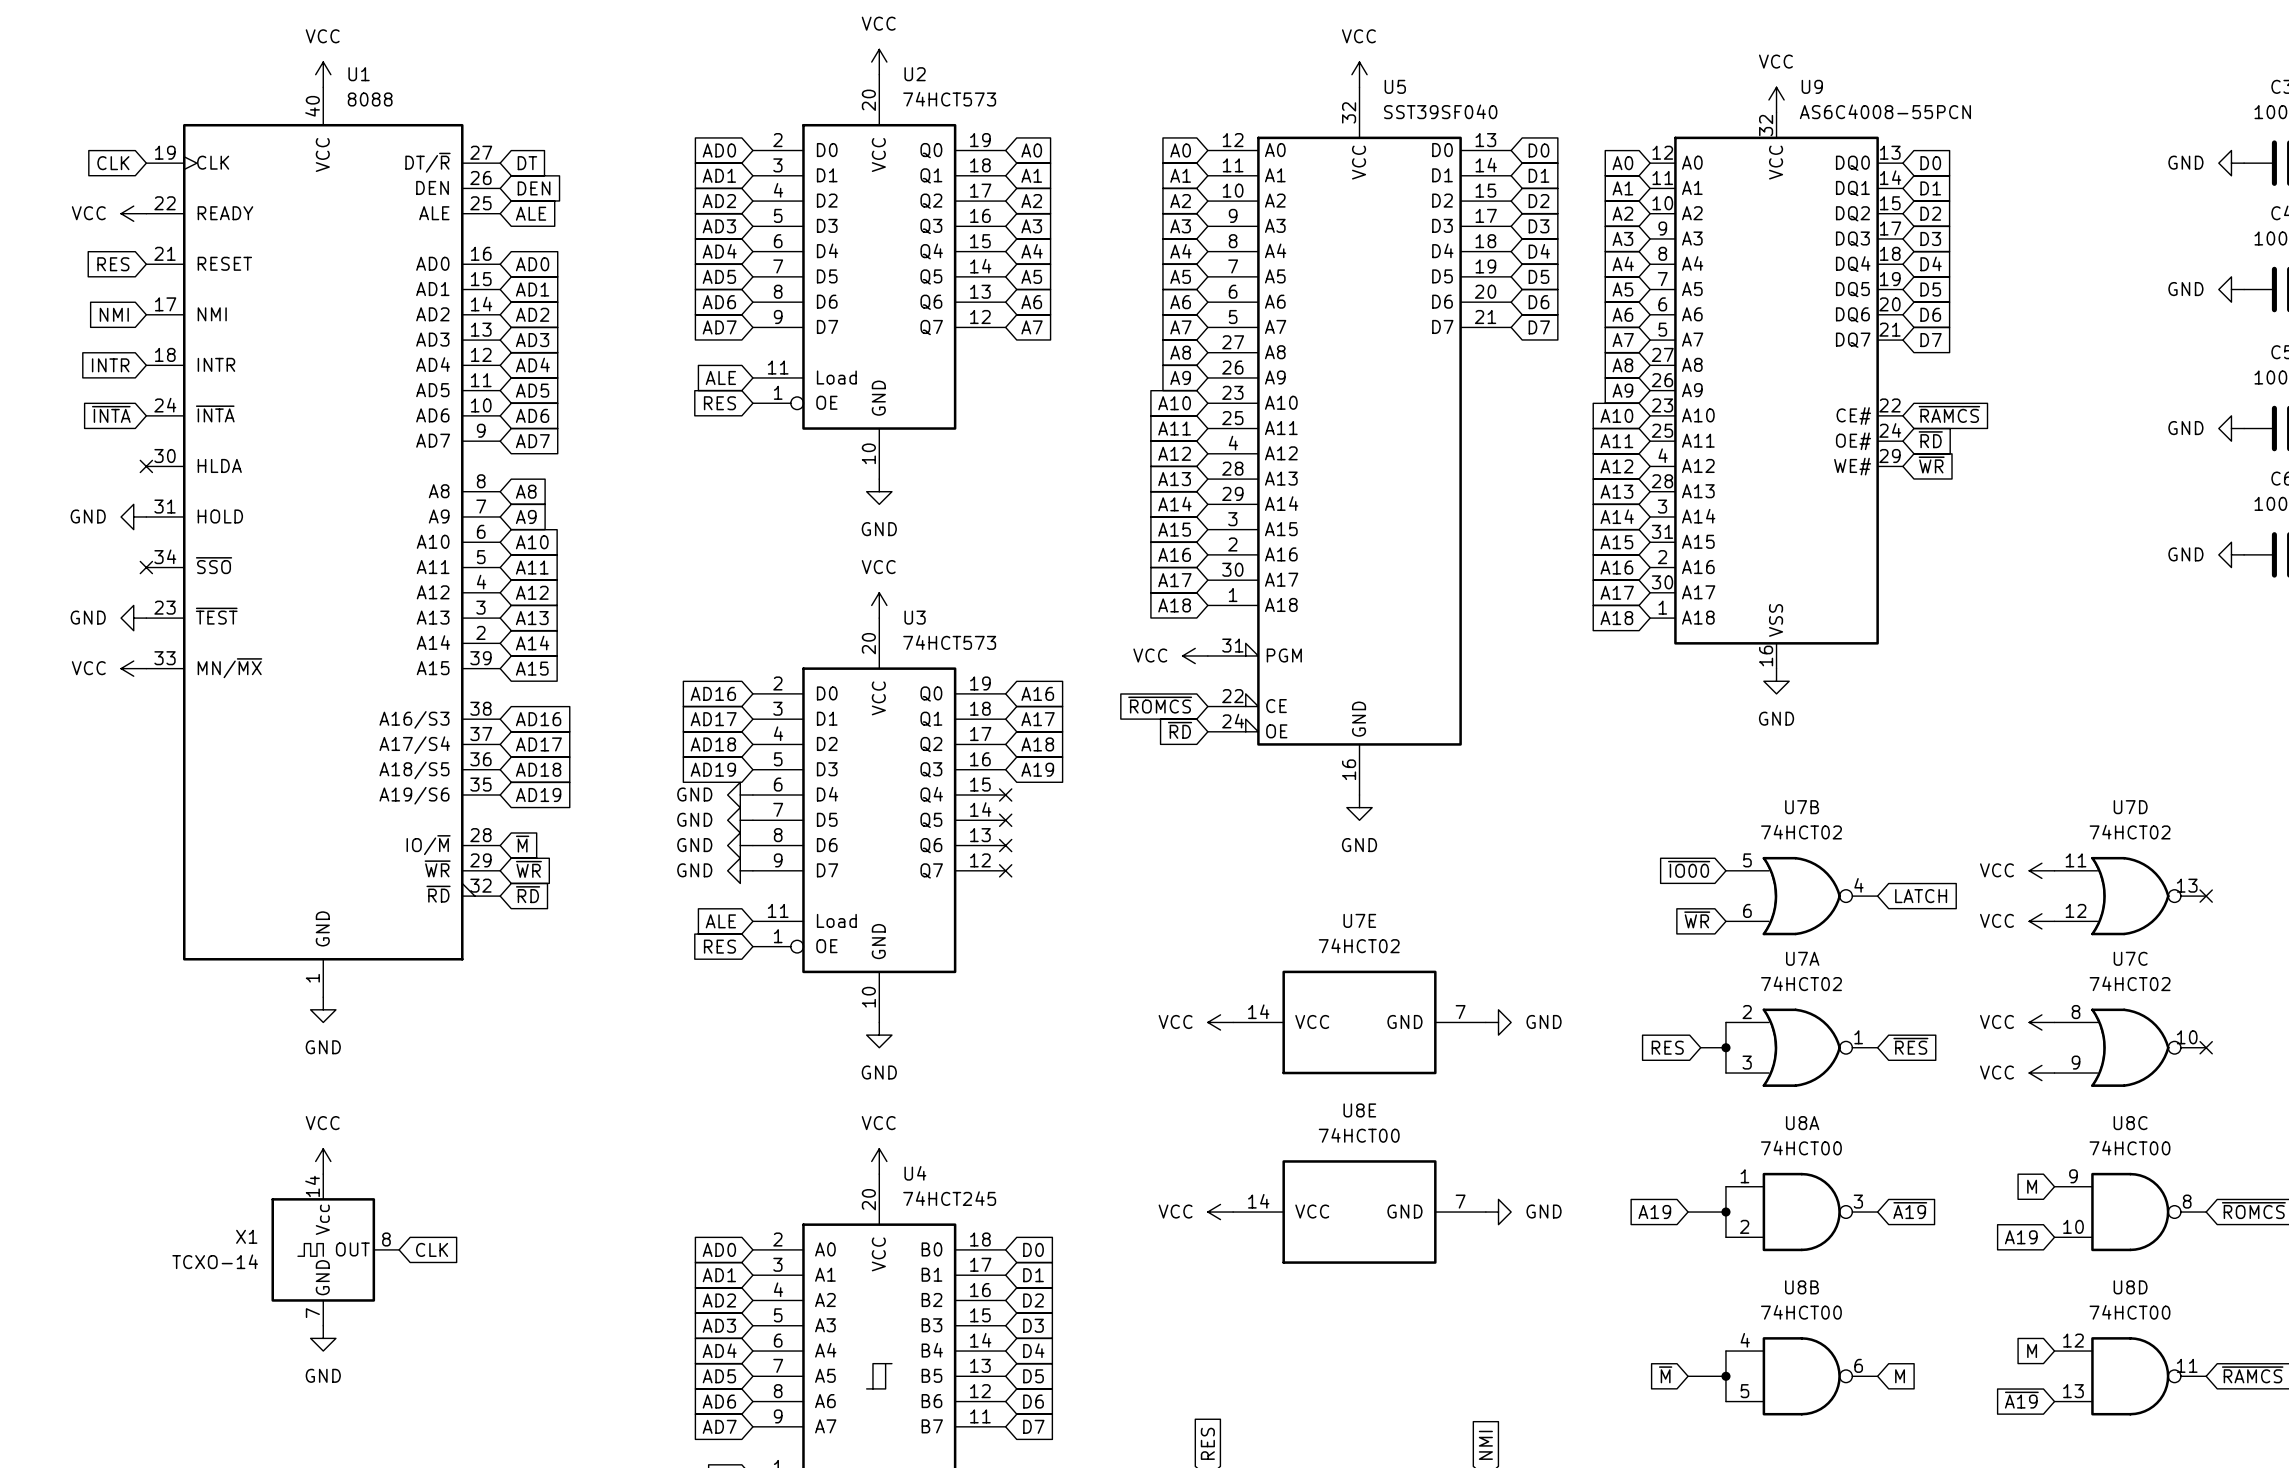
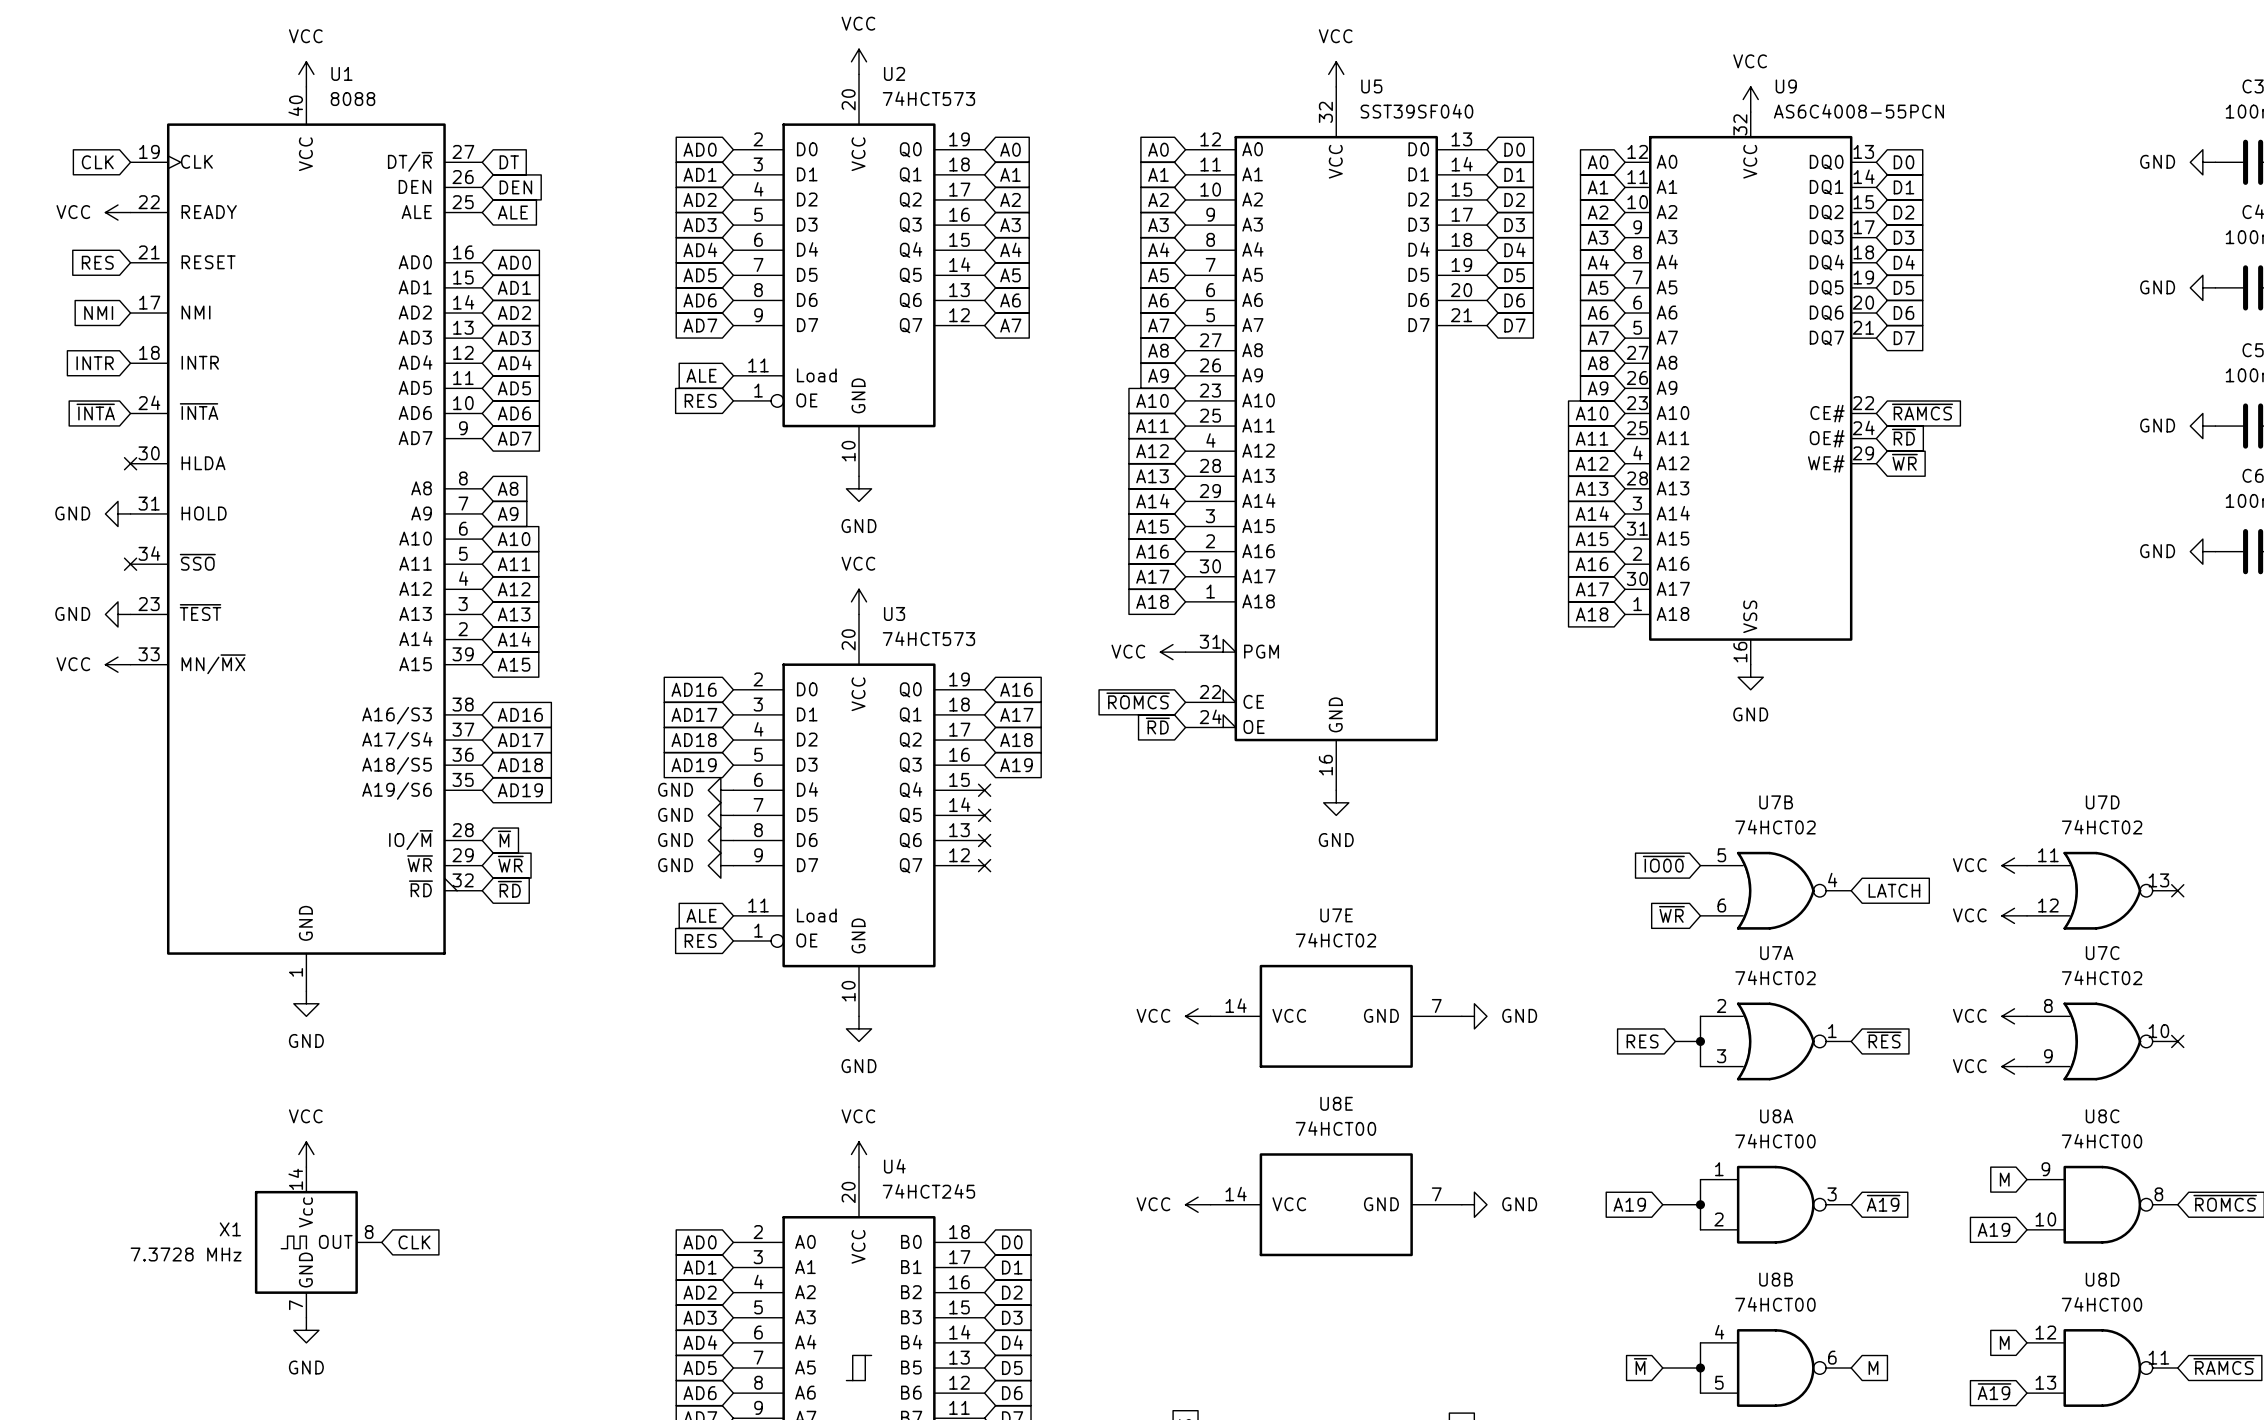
X1 value: TCXO-14 (215, 1261) -> 7.3728 MHz (186, 1254)

